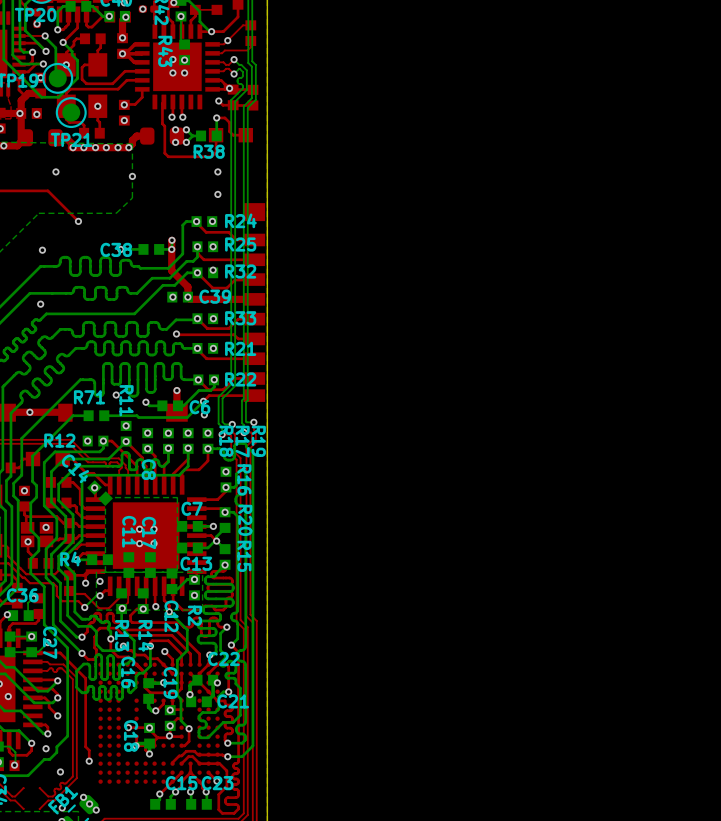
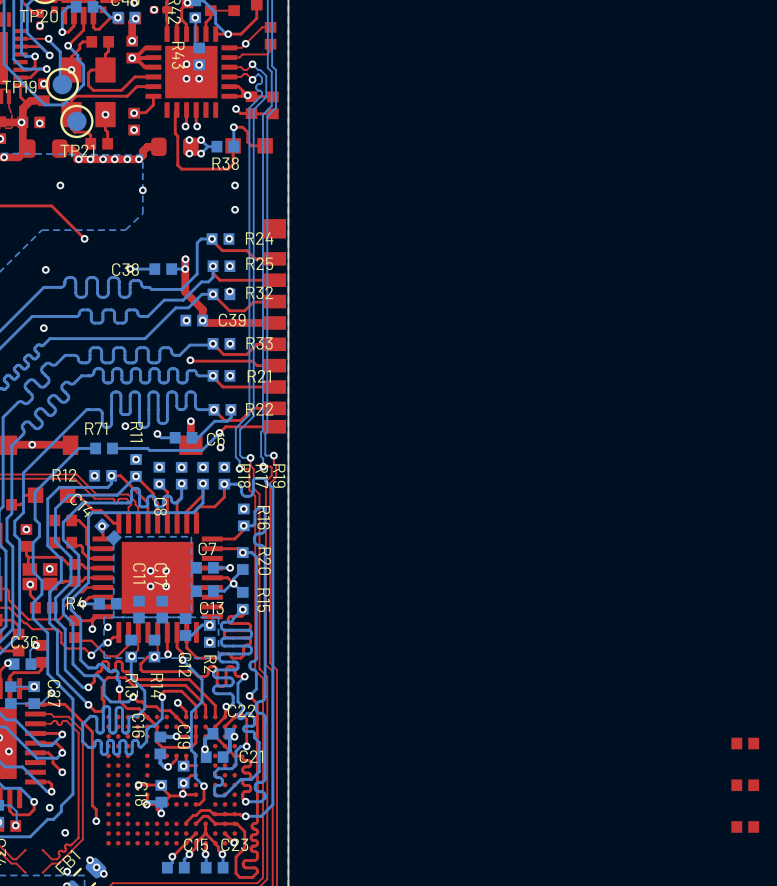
part: none -> (745, 743)
part: none -> (745, 785)
part: none -> (745, 826)

